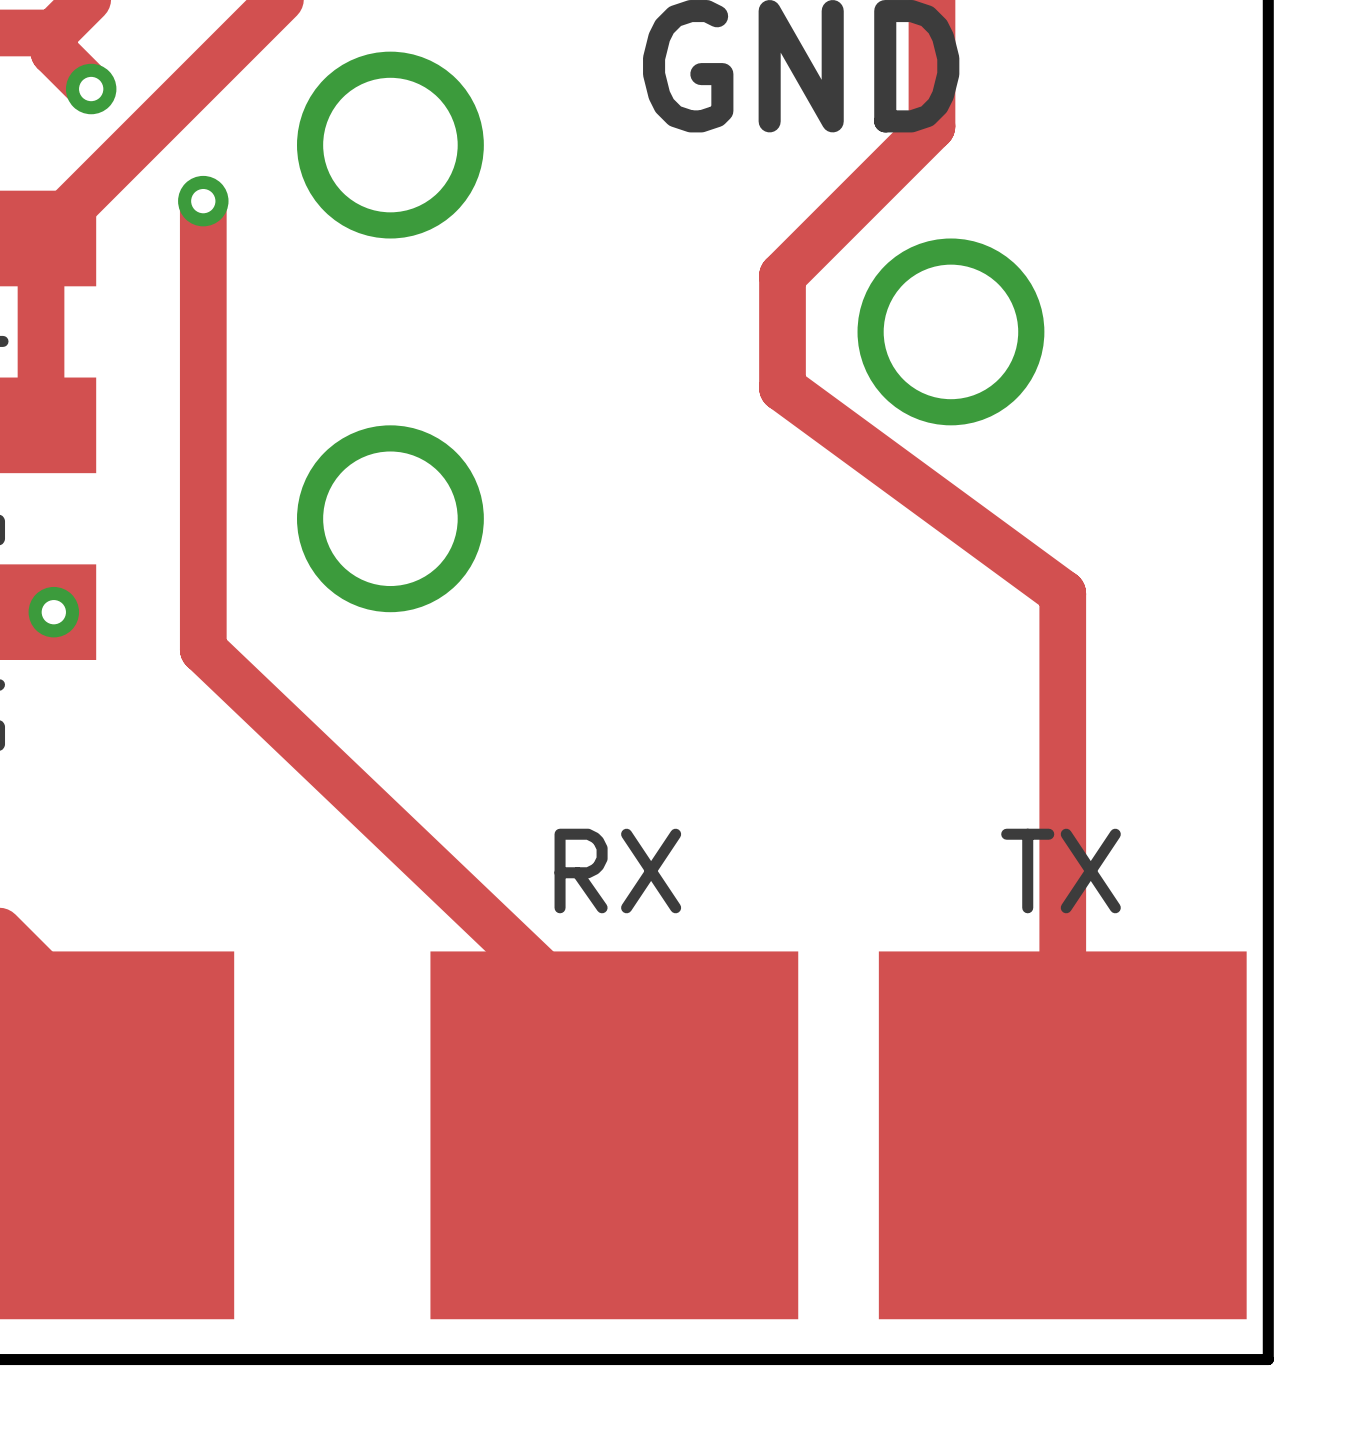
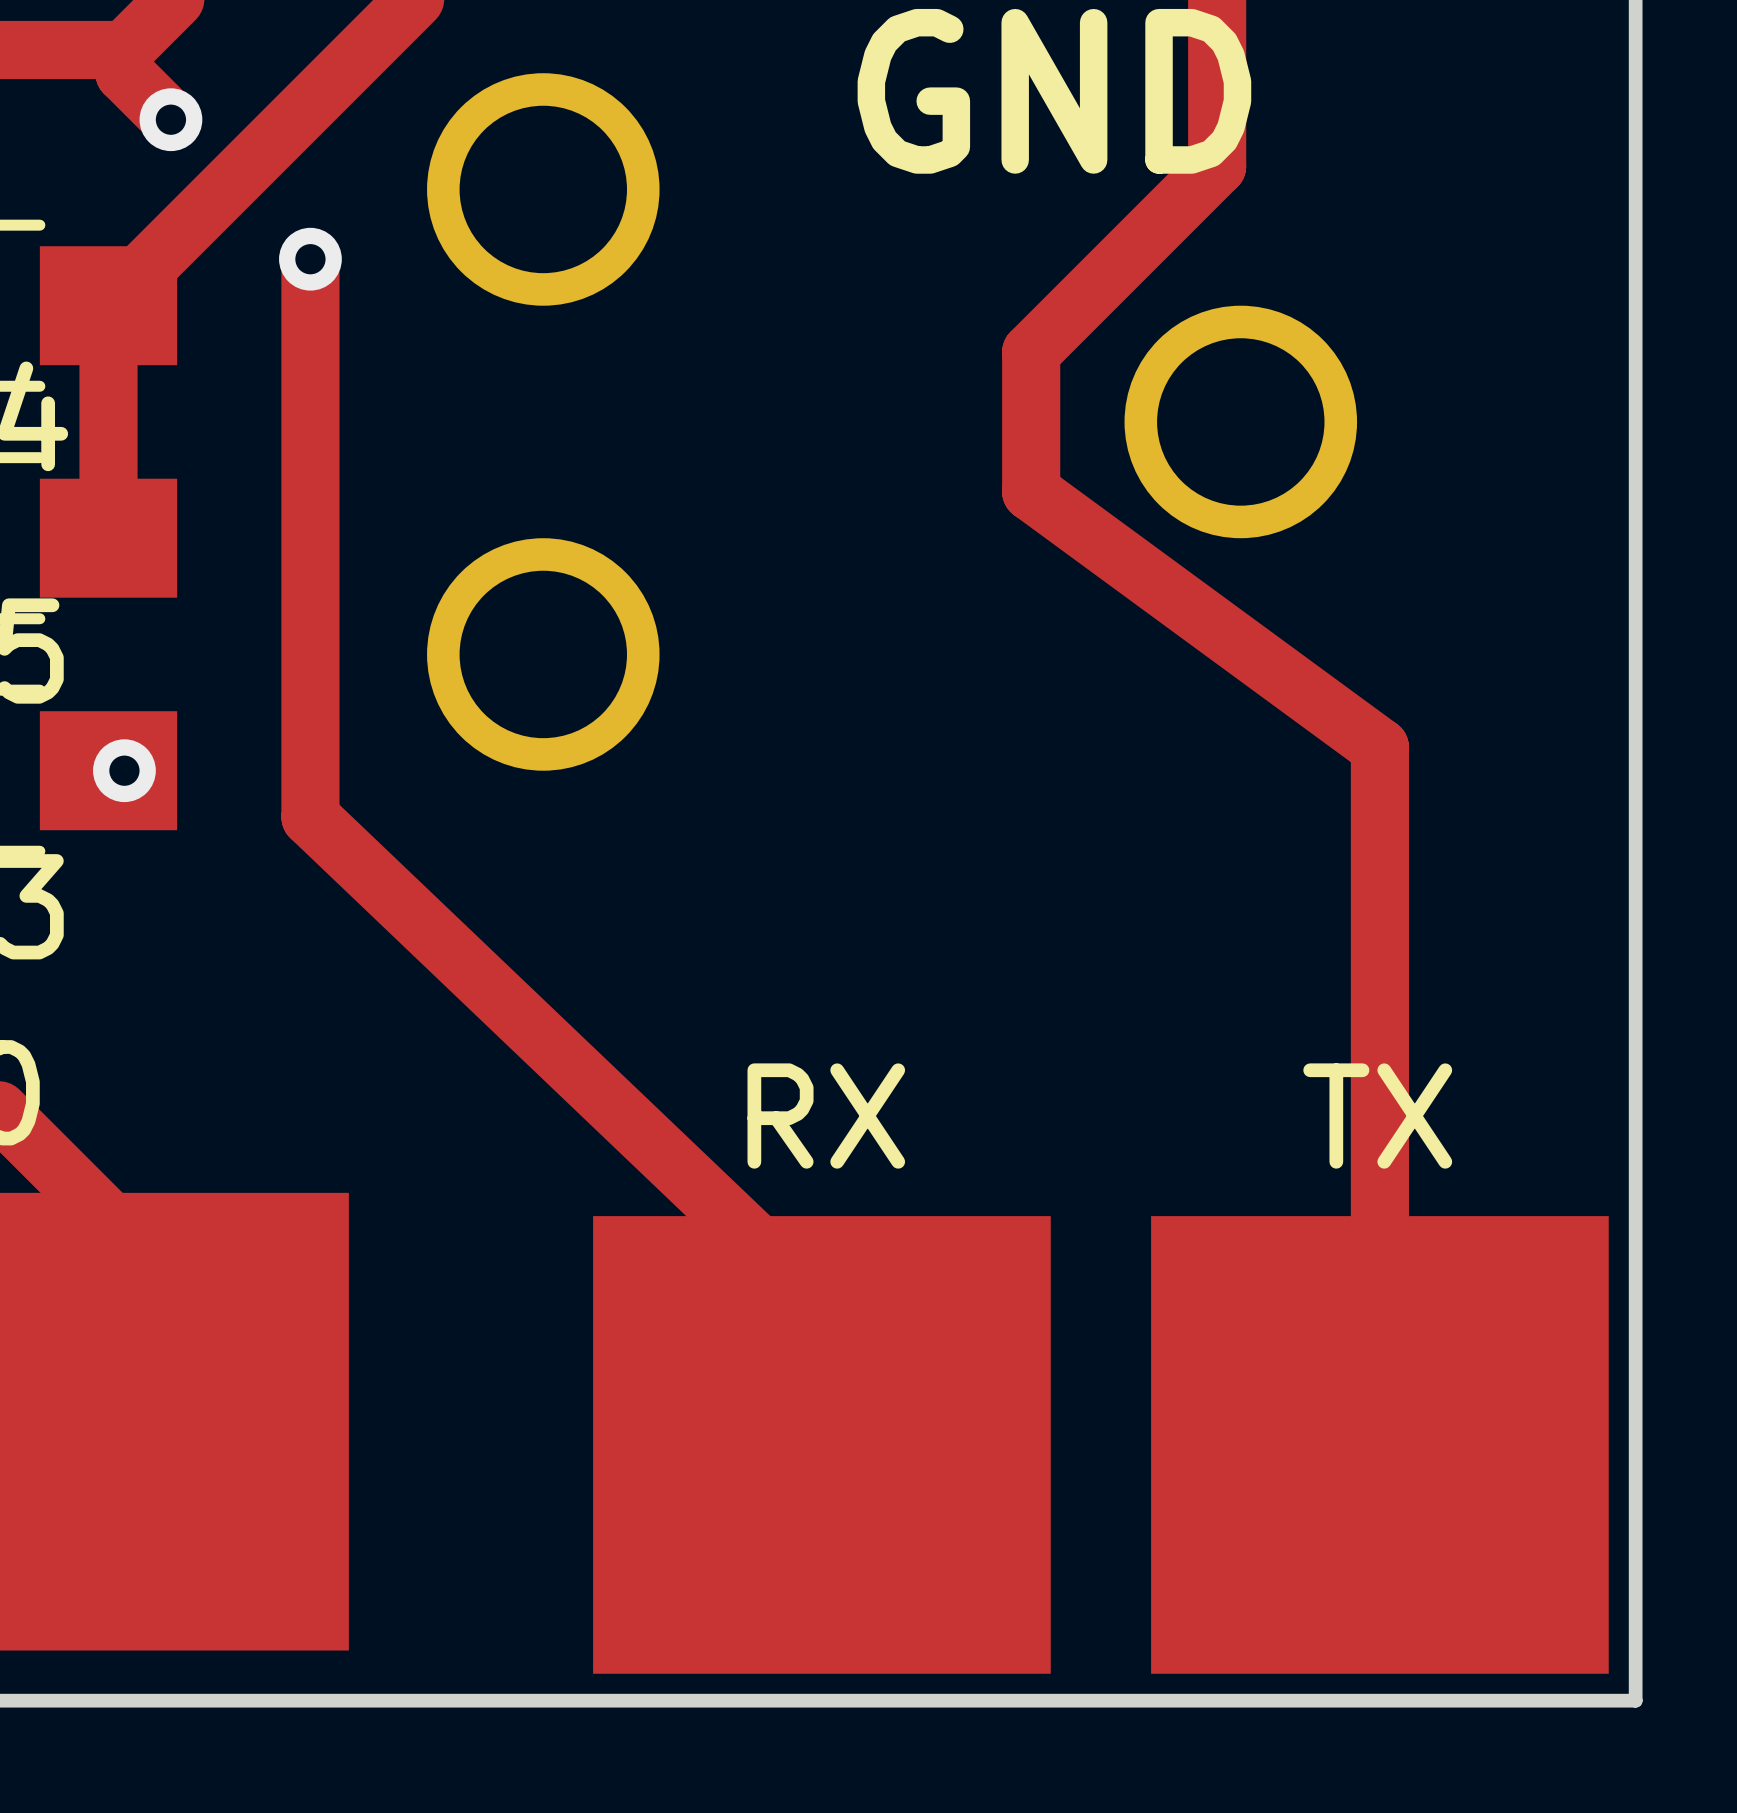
RX position: (614, 1135) -> (821, 1444)
TX position: (1062, 1135) -> (1379, 1444)

